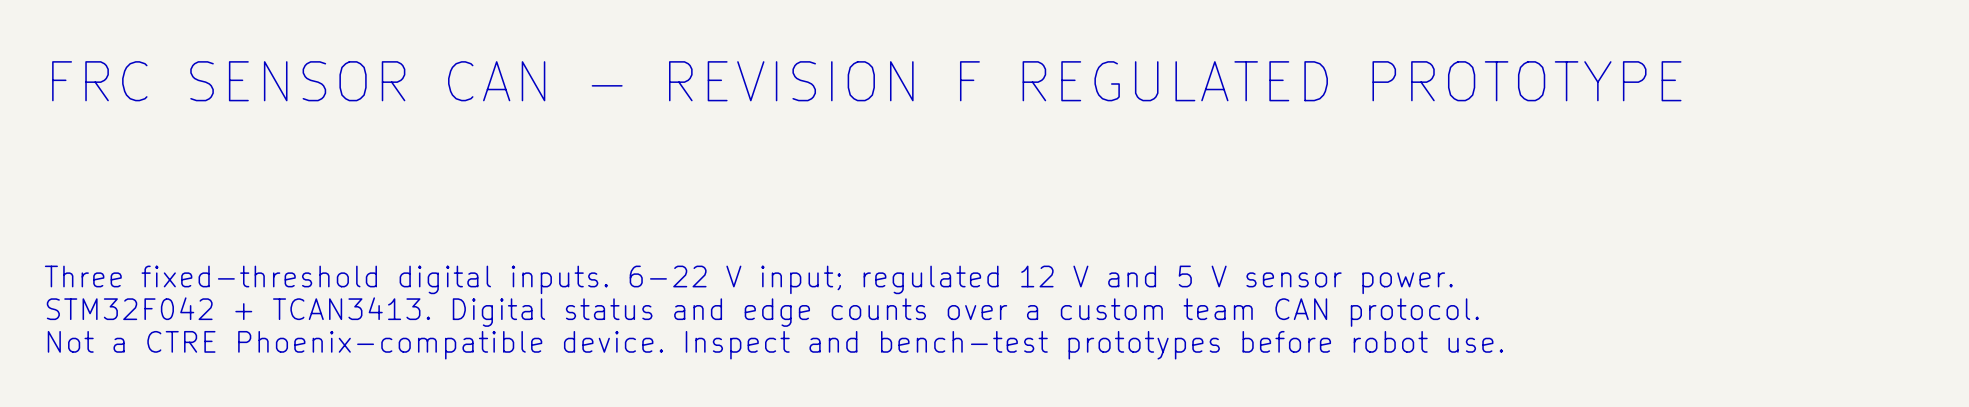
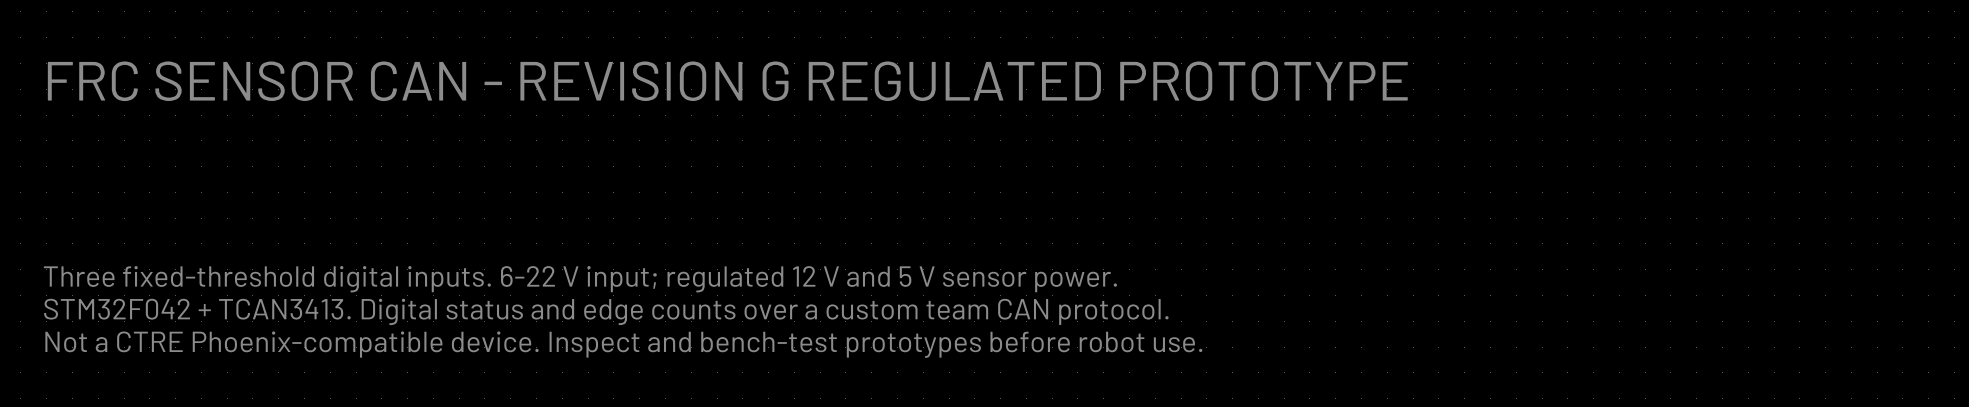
text: FRC SENSOR CAN - REVISION F REGULATED PROTOTYPE (866, 81) -> FRC SENSOR CAN - REVISION G REGULATED PROTOTYPE (727, 81)

